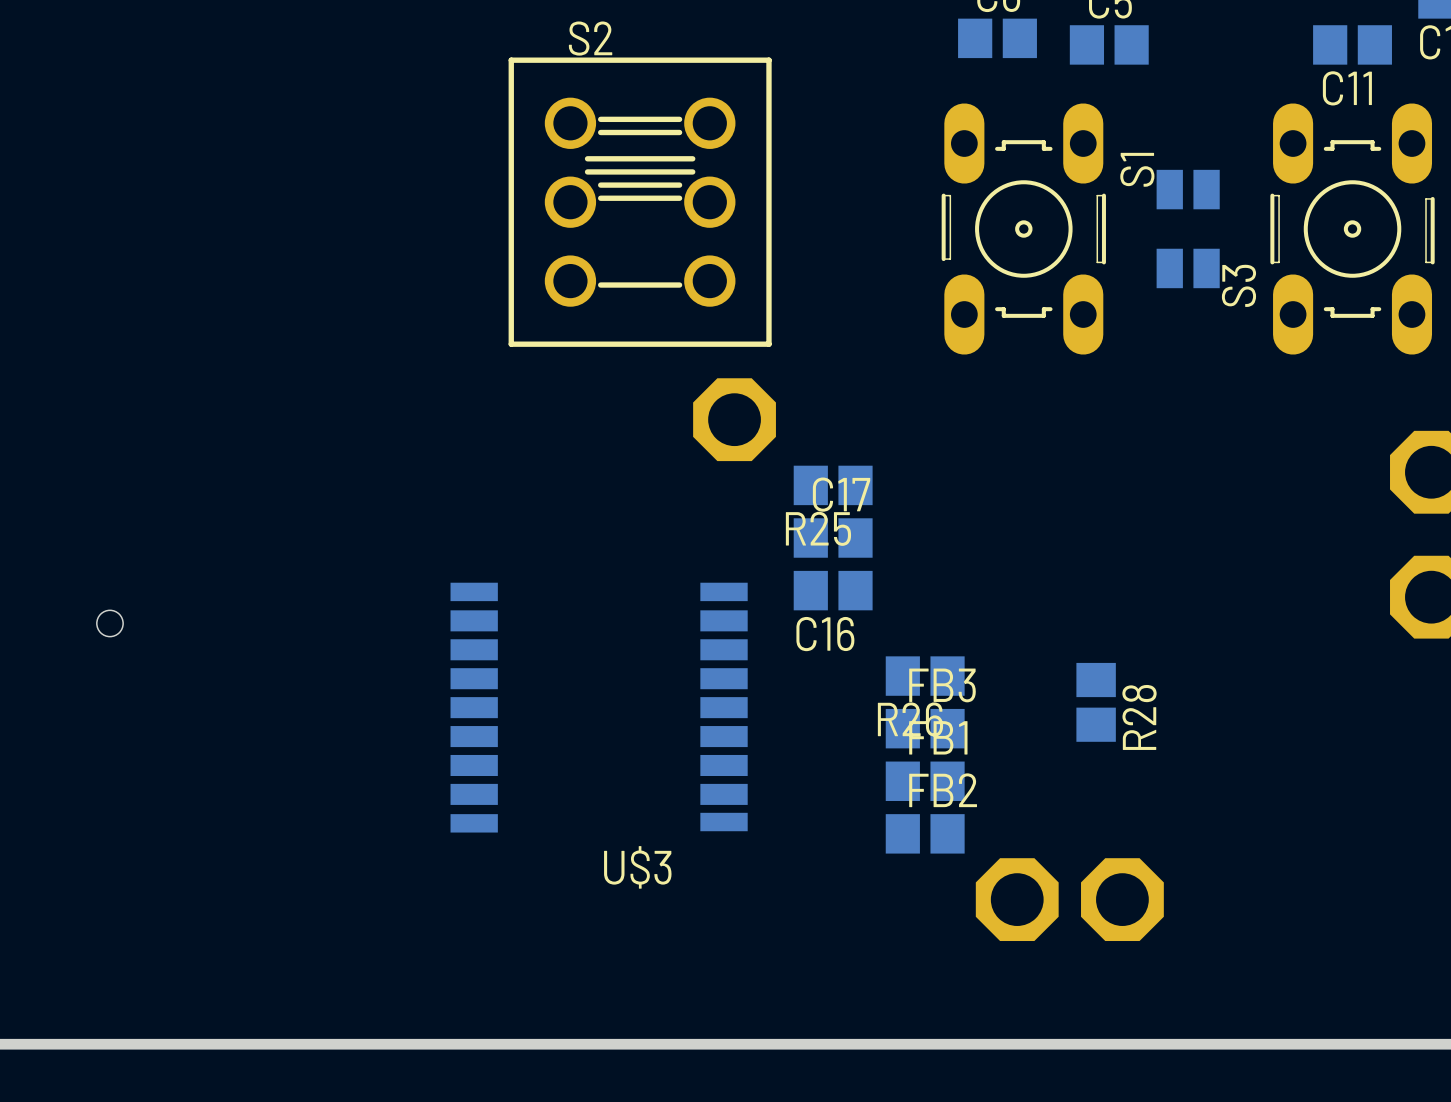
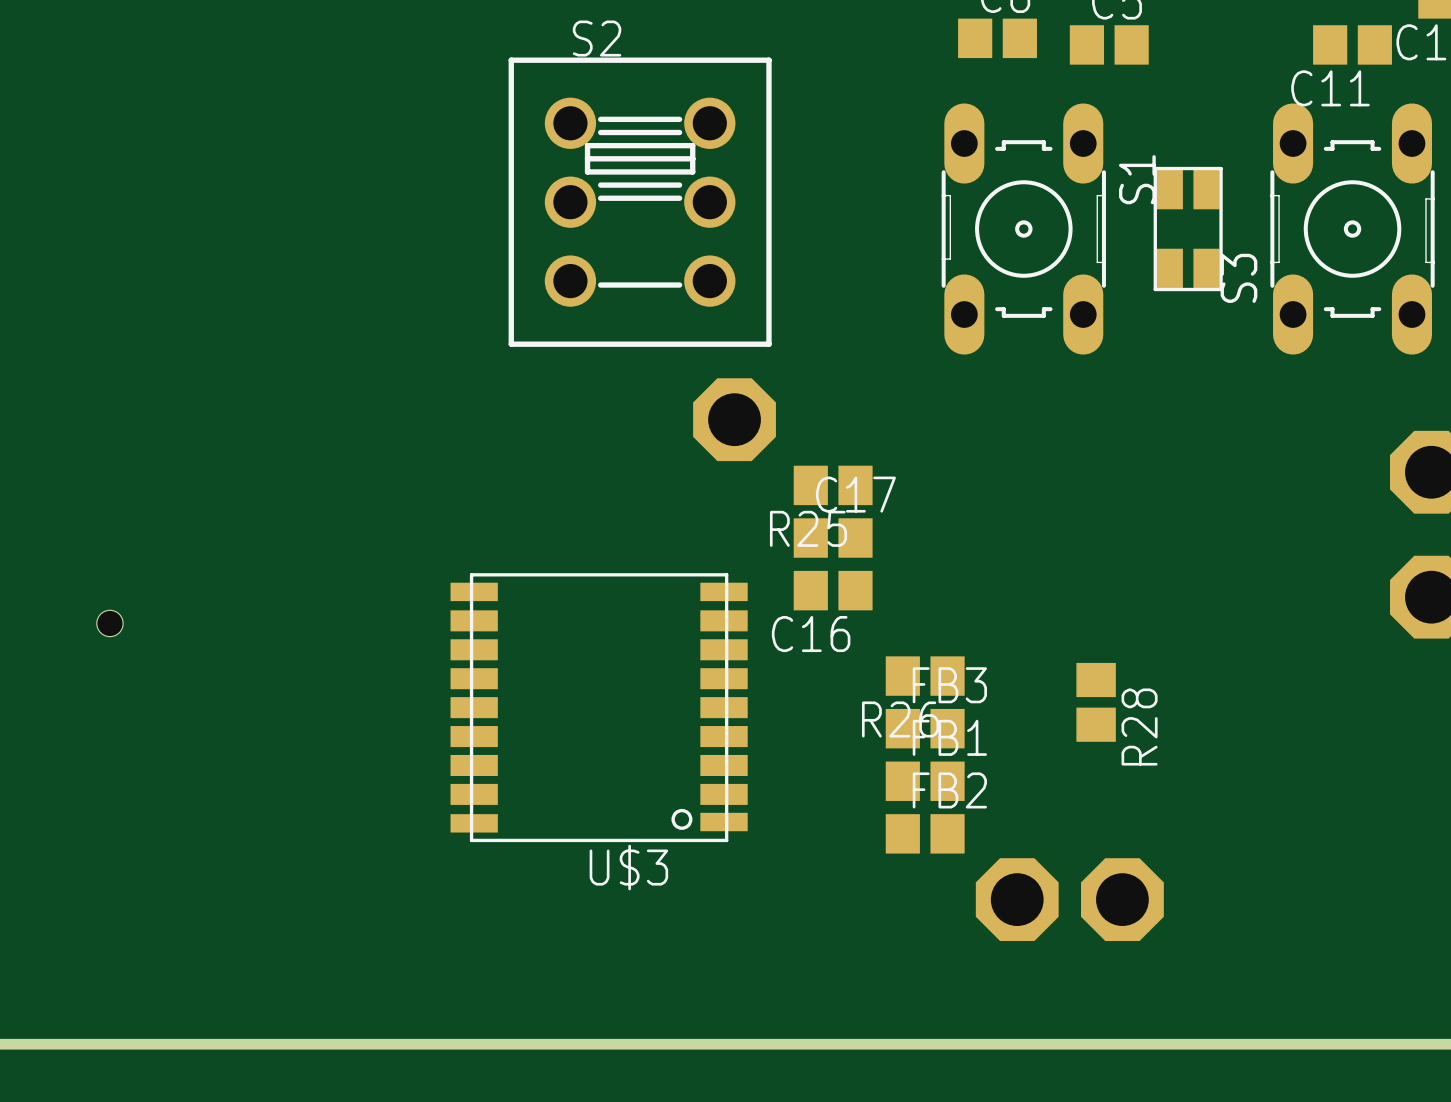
S2 footprint: [508, 57, 772, 347] -> [508, 57, 772, 347]
S1 footprint: [941, 103, 1106, 355] -> [941, 103, 1106, 355]
S3 footprint: [1270, 103, 1435, 355] -> [1270, 103, 1435, 355]
part footprint: [1156, 169, 1220, 289] -> [1153, 166, 1223, 292]
U$3 footprint: [450, 582, 748, 833] -> [450, 573, 748, 843]

